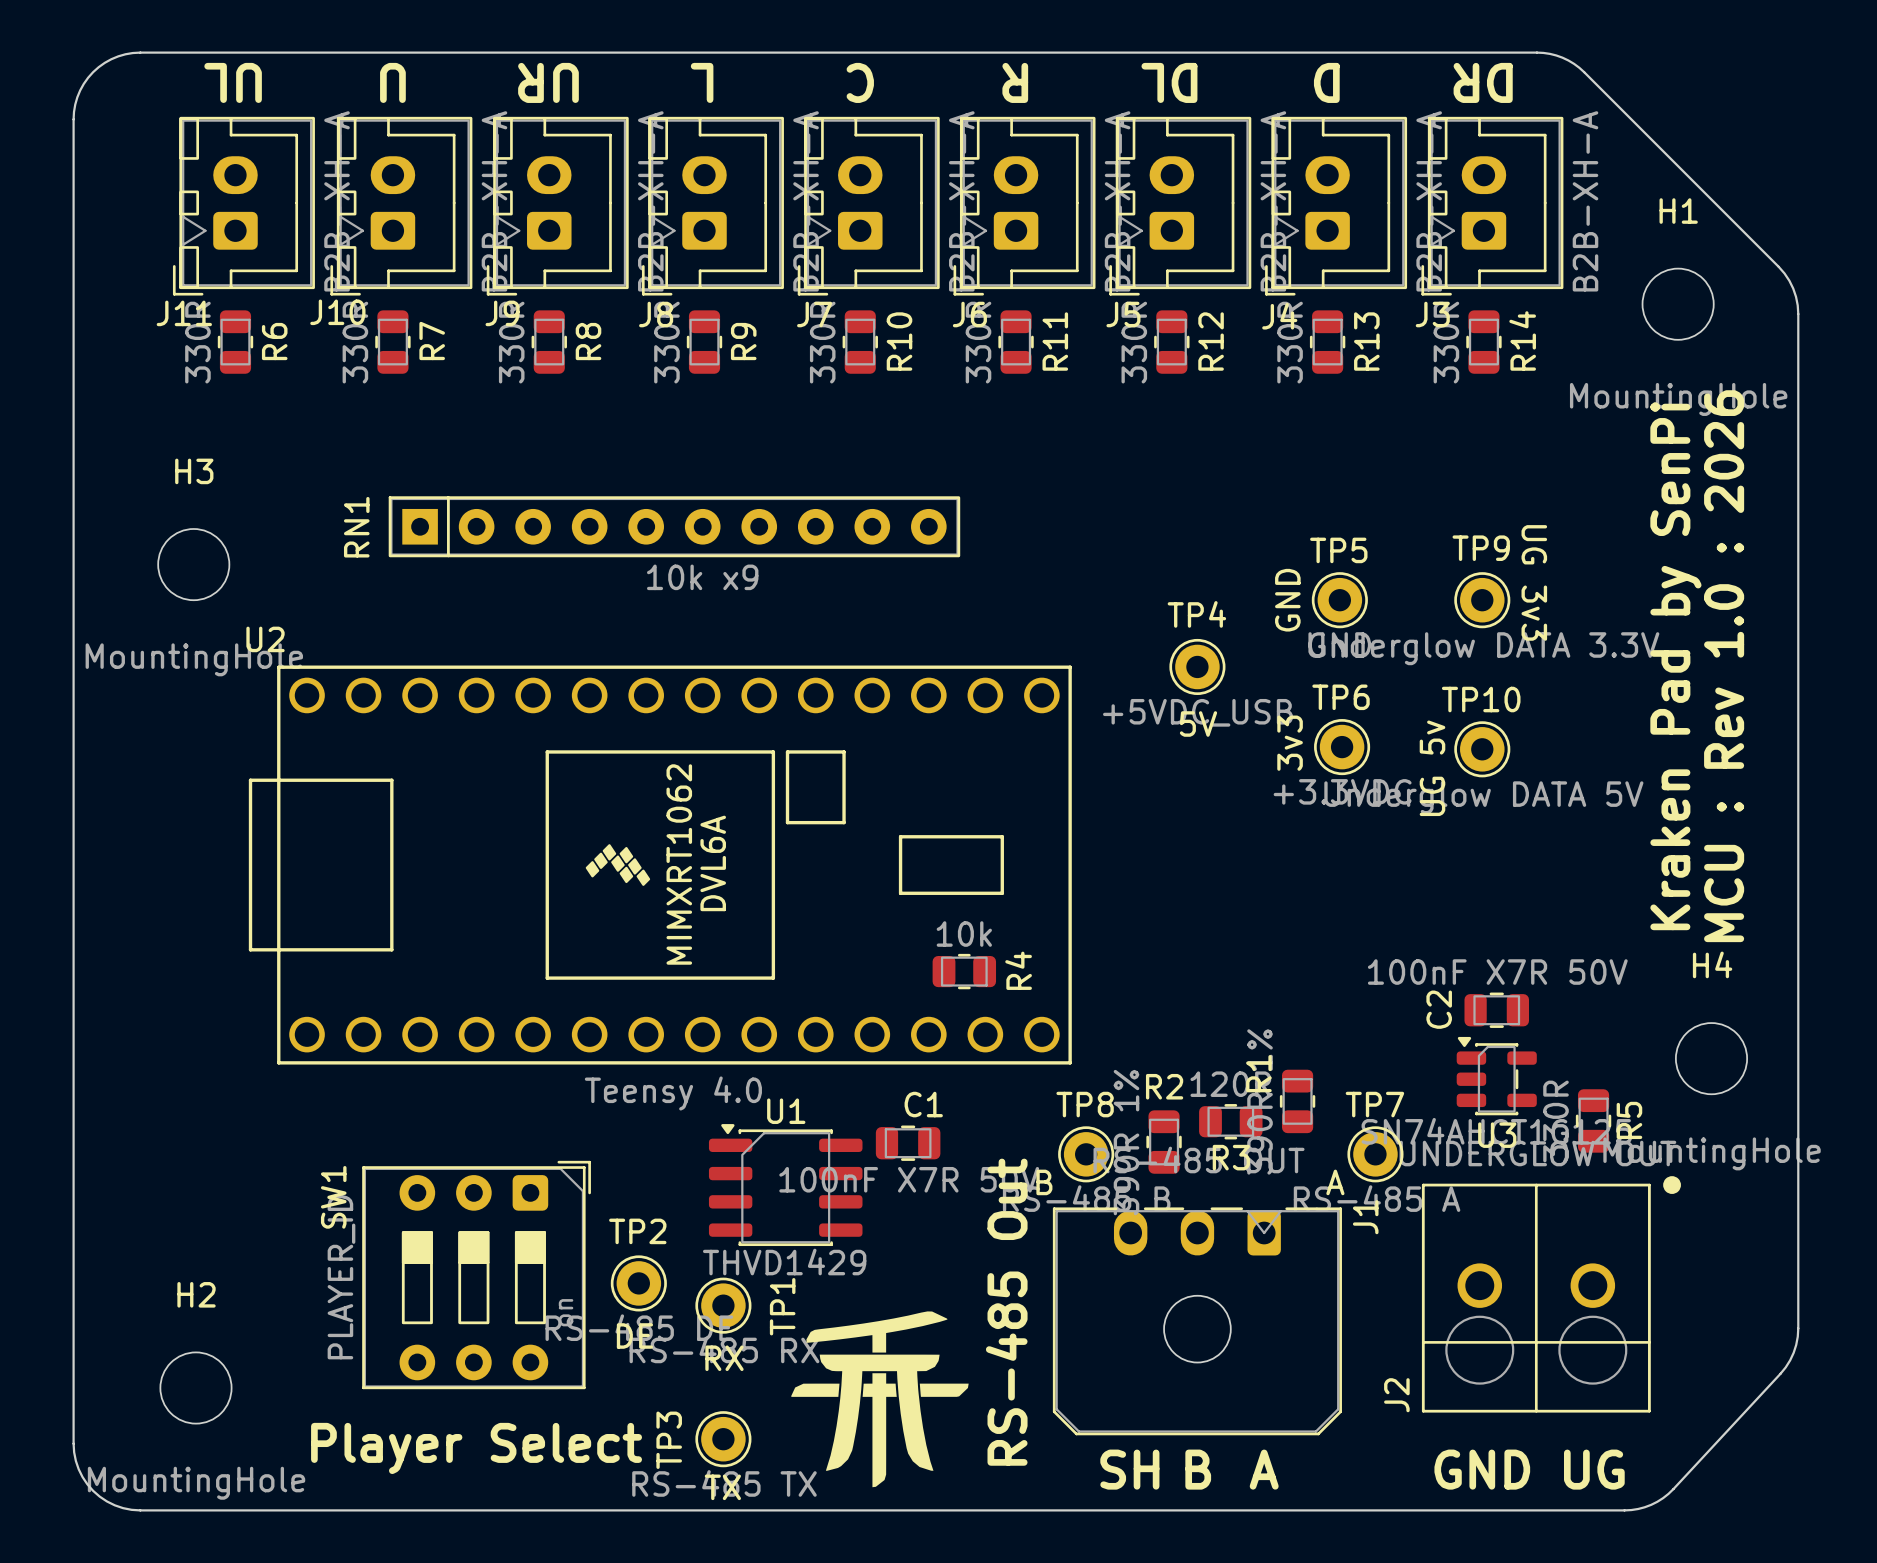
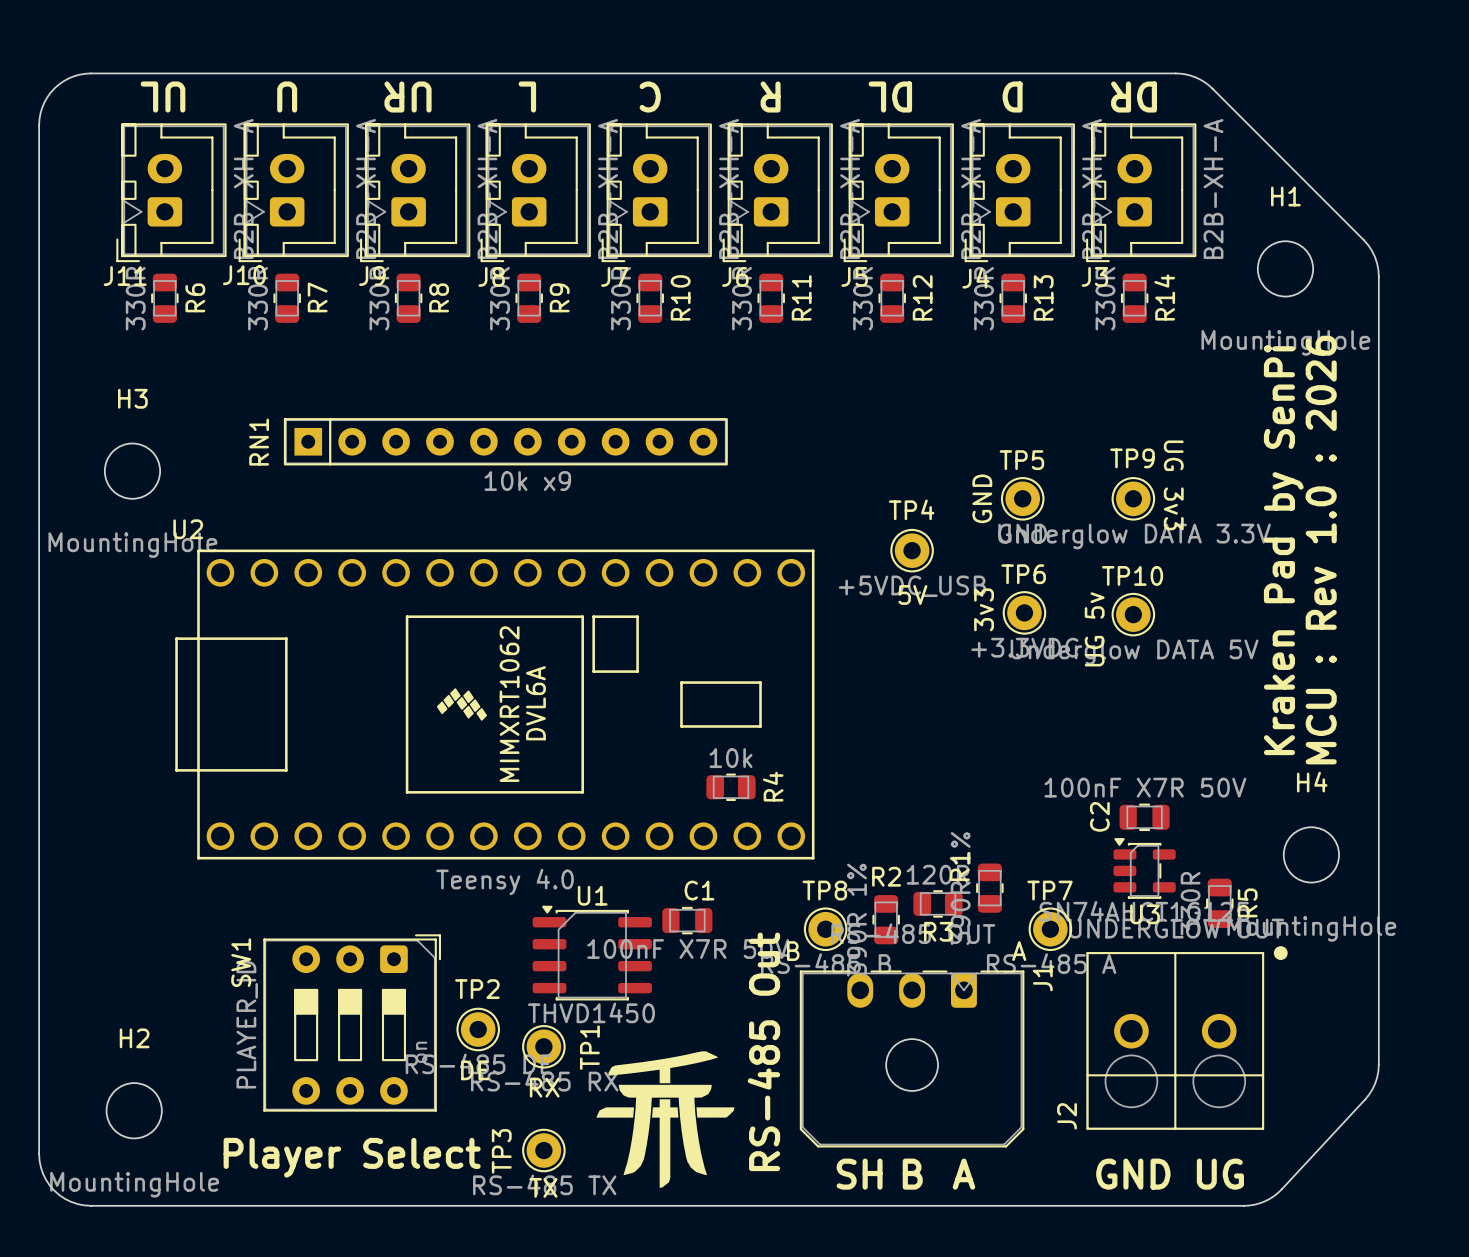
U1 value: THVD1429 (784, 1262) -> THVD1450 (591, 1012)

